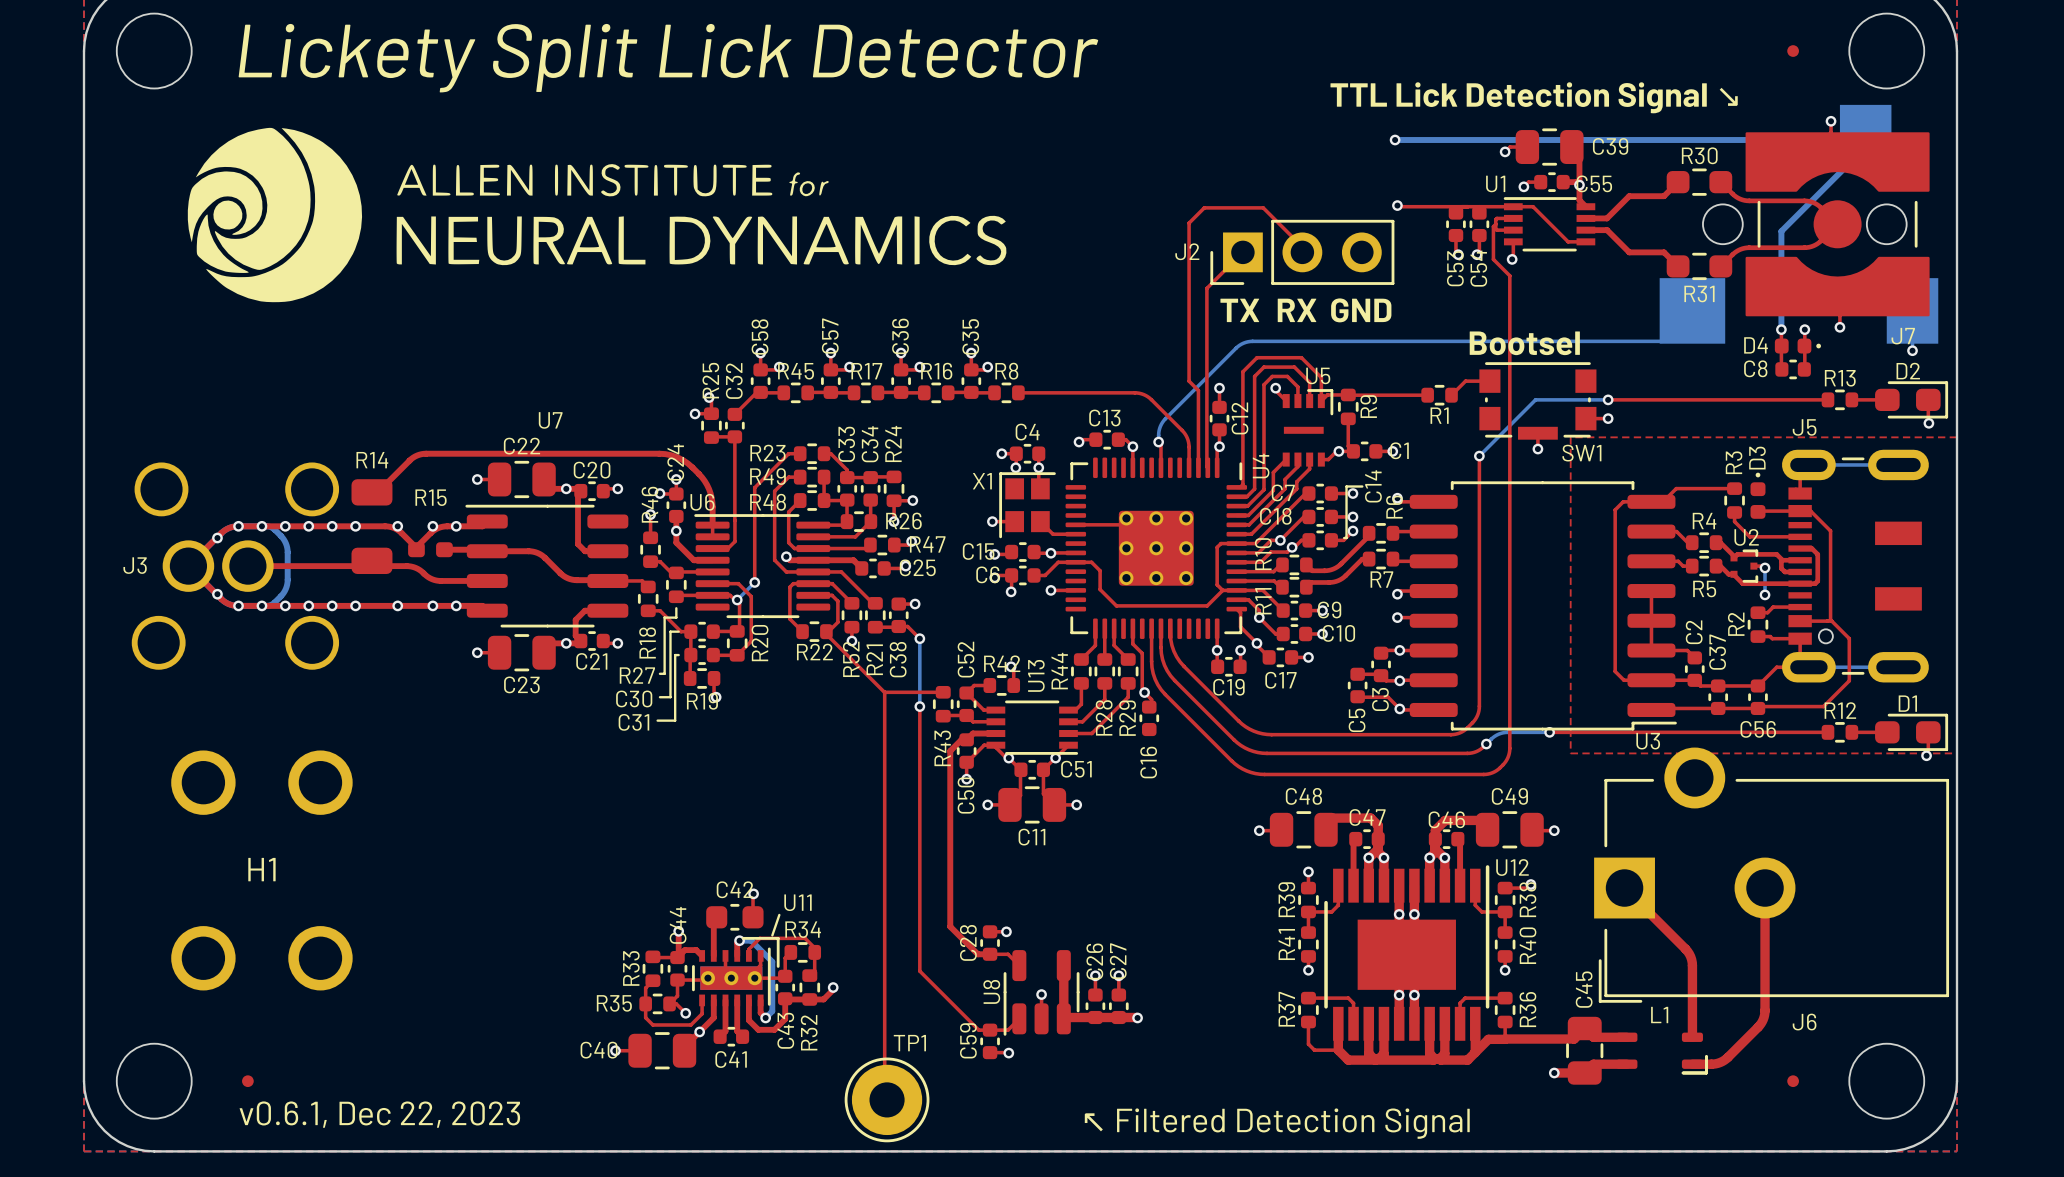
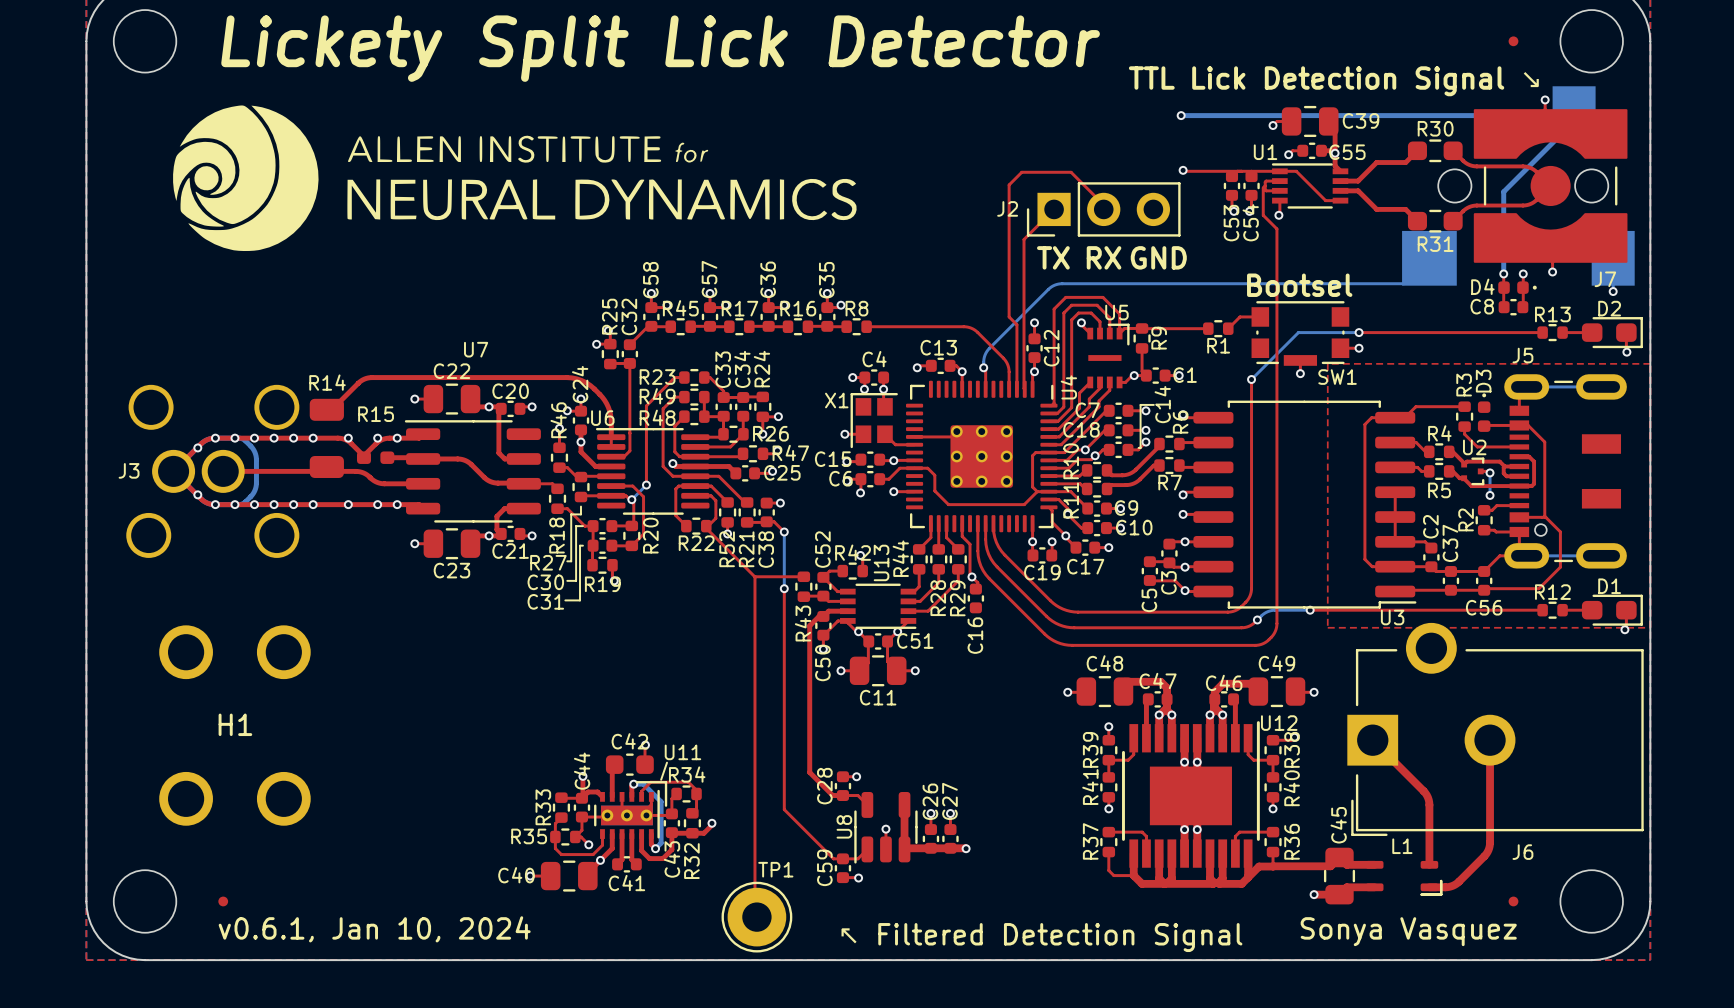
text: v0.6.1, Dec 22, 2023 (379, 1114) -> v0.6.1, Jan 10, 2024 (374, 929)
text: none -> Sonya Vasquez (1408, 931)

